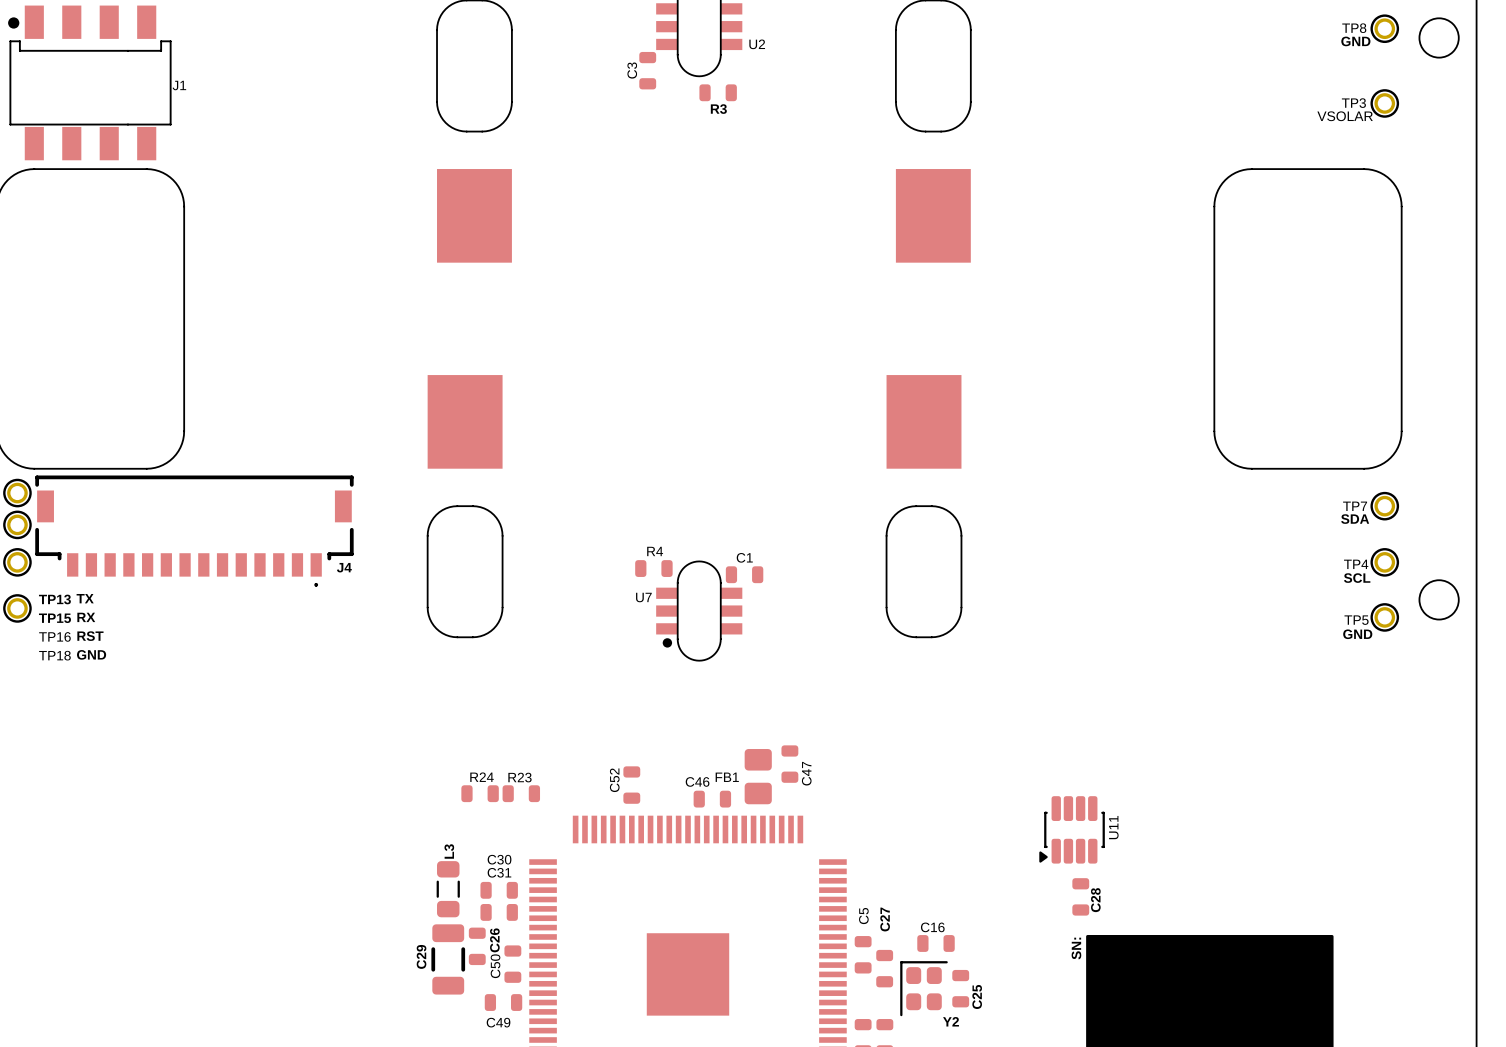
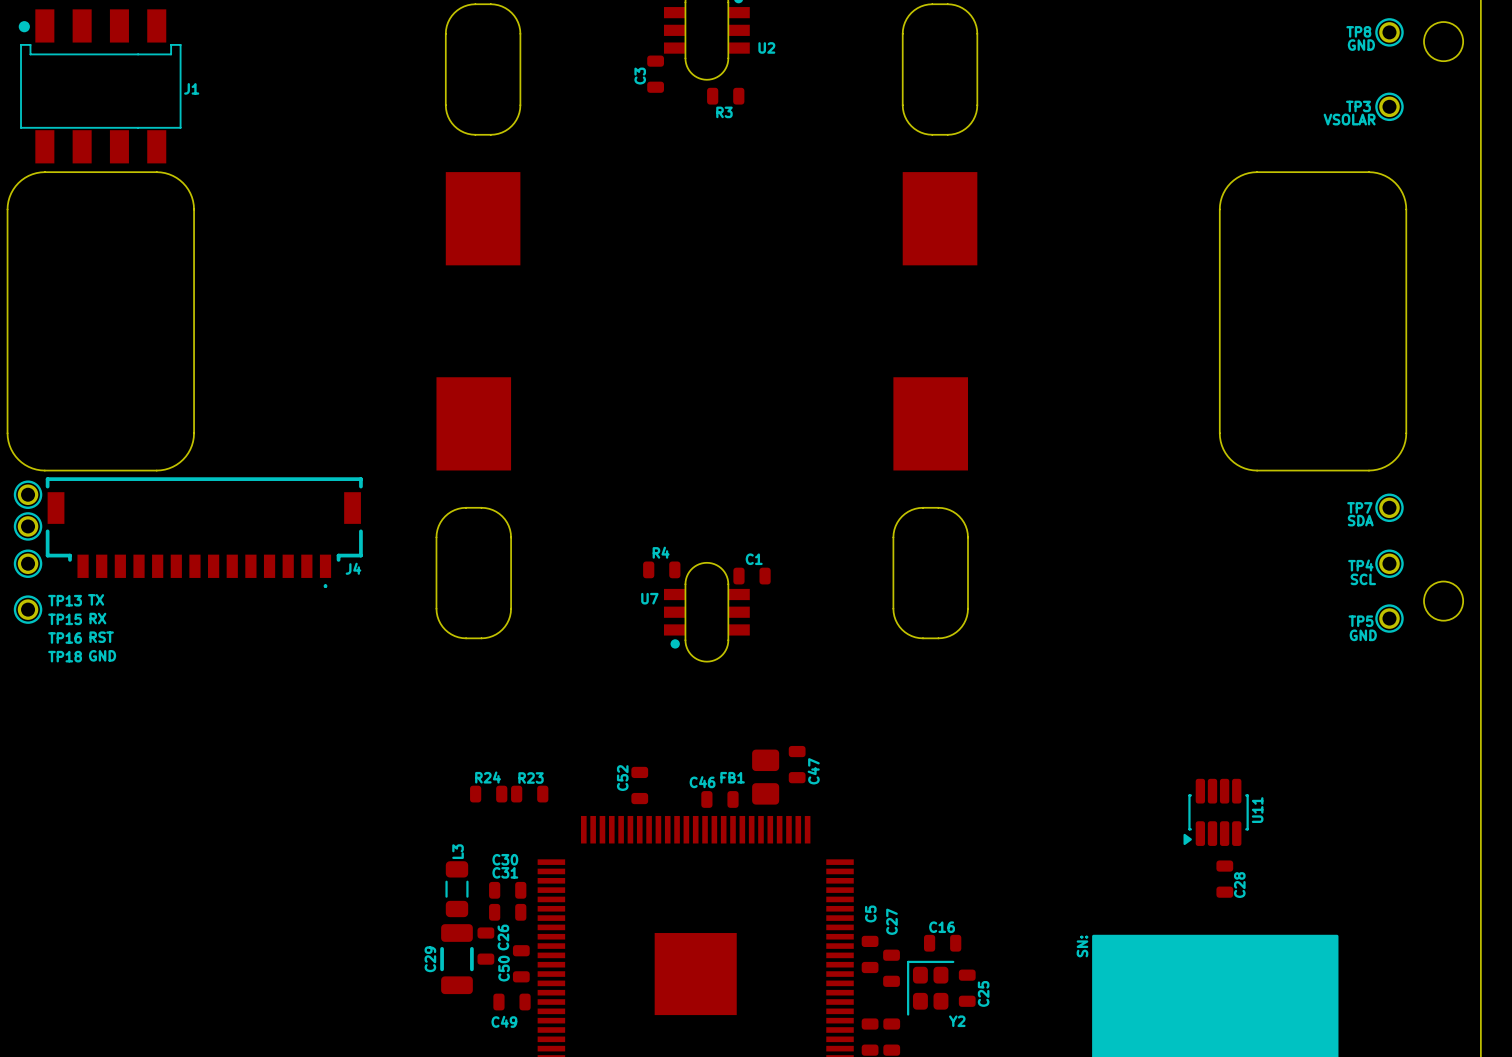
U11 position: (1072, 829) -> (1216, 812)
C28 position: (1080, 896) -> (1224, 879)

